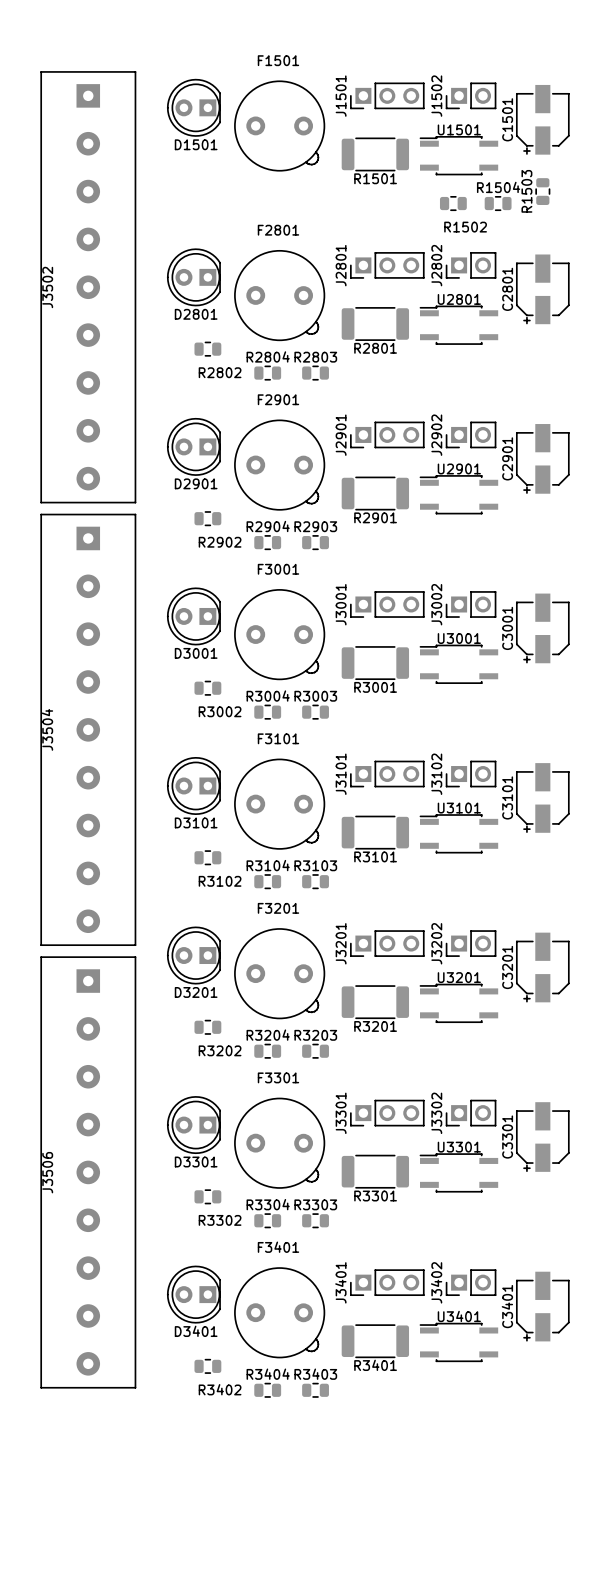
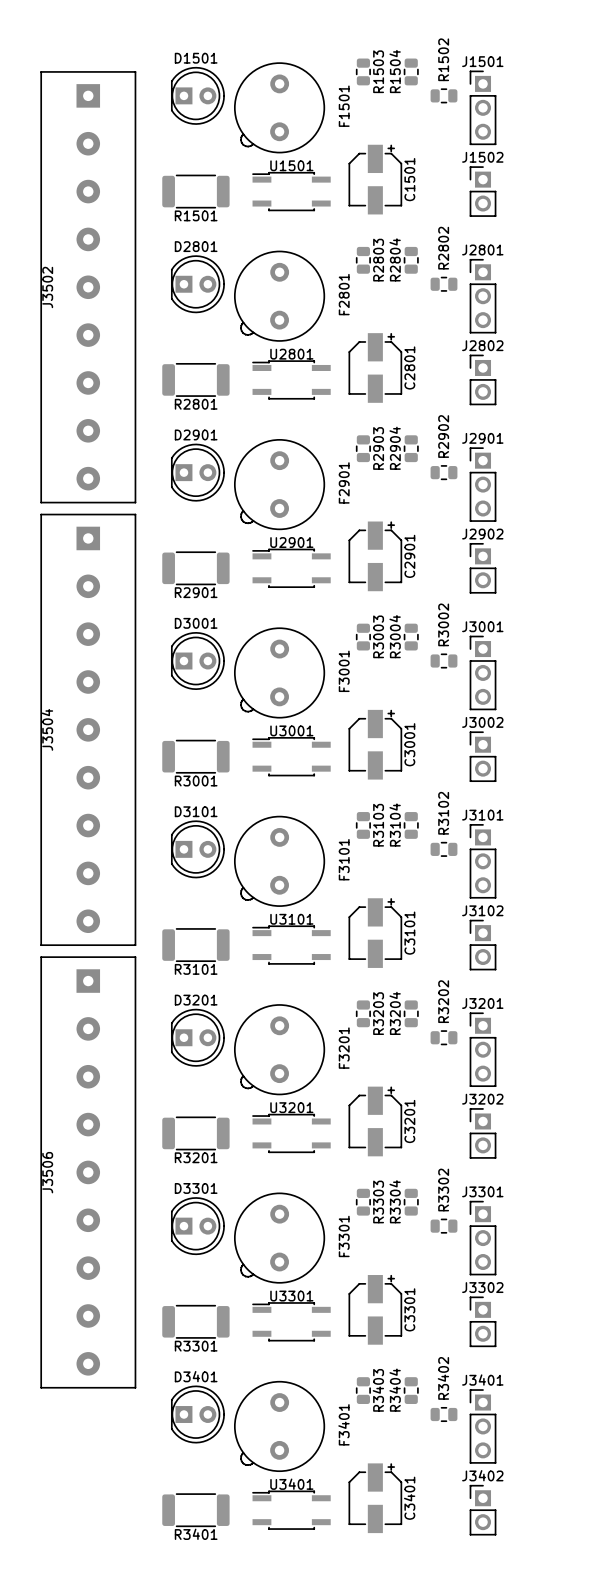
J1501 rotation: 0° (387, 95) -> 90° clockwise (483, 107)
J1501 position: (387, 95) -> (483, 107)
J1502 rotation: 0° (471, 95) -> 90° clockwise (483, 191)
J1502 position: (471, 95) -> (483, 191)
D1501 rotation: 0° (193, 107) -> 180° (197, 95)
C1501 rotation: 0° (542, 119) -> 180° (375, 179)
C1501 position: (542, 119) -> (375, 179)
F1501 rotation: 0° (279, 126) -> 90° clockwise (279, 107)
R1501 position: (375, 154) -> (195, 191)
U1501 position: (459, 155) -> (291, 191)
R1504 name position: R1504 (498, 187) -> R1504 (395, 71)
R1503 name position: R1503 (526, 191) -> R1503 (378, 71)
R1503 position: (542, 191) -> (363, 71)
R1502 position: (453, 203) -> (444, 95)
R1504 rotation: 0° (498, 203) -> 90° clockwise (411, 71)
R1504 position: (498, 203) -> (411, 71)
R1502 name rotation: 0° (465, 227) -> 90° counterclockwise (443, 59)
R1502 name position: R1502 (465, 227) -> R1502 (443, 59)
J2801 rotation: 0° (387, 265) -> 90° clockwise (483, 296)
J2801 position: (387, 265) -> (483, 296)
J2802 rotation: 0° (471, 265) -> 90° clockwise (483, 379)
J2802 position: (471, 265) -> (483, 379)
D2801 rotation: 0° (193, 277) -> 180° (197, 284)
C2801 rotation: 0° (542, 289) -> 180° (375, 367)
C2801 position: (542, 289) -> (375, 367)
F2801 rotation: 0° (279, 295) -> 90° clockwise (279, 296)
R2801 position: (375, 324) -> (195, 379)
U2801 position: (459, 325) -> (291, 379)
R2802 position: (207, 349) -> (444, 284)
R2804 name position: R2804 (268, 356) -> R2804 (395, 259)
R2802 name rotation: 0° (220, 372) -> 90° counterclockwise (443, 248)
R2802 name position: R2802 (220, 372) -> R2802 (443, 248)
R2804 rotation: 0° (267, 373) -> 90° clockwise (411, 260)
R2804 position: (267, 373) -> (411, 260)
R2803 rotation: 0° (315, 373) -> 90° clockwise (363, 260)
R2803 position: (315, 373) -> (363, 260)
D2901 footprint: [167, 418, 221, 476] -> [171, 443, 225, 502]
J2901 rotation: 0° (387, 434) -> 90° clockwise (483, 484)
J2901 position: (387, 434) -> (483, 484)
J2902 rotation: 0° (471, 434) -> 90° clockwise (483, 568)
J2902 position: (471, 434) -> (483, 568)
C2901 rotation: 0° (542, 458) -> 180° (375, 556)
C2901 position: (542, 458) -> (375, 556)
F2901 rotation: 0° (279, 465) -> 90° clockwise (279, 484)
D2901 name position: D2901 (196, 483) -> D2901 (196, 434)
R2901 position: (375, 493) -> (195, 568)
U2901 position: (459, 494) -> (291, 568)
R2902 position: (207, 518) -> (444, 472)
R2904 name position: R2904 (268, 526) -> R2904 (395, 448)
R2902 name rotation: 0° (220, 542) -> 90° counterclockwise (443, 436)
R2902 name position: R2902 (220, 542) -> R2902 (443, 436)
R2904 rotation: 0° (267, 542) -> 90° clockwise (411, 448)
R2904 position: (267, 542) -> (411, 448)
R2903 rotation: 0° (315, 542) -> 90° clockwise (363, 448)
R2903 position: (315, 542) -> (363, 448)
J3001 rotation: 0° (387, 604) -> 90° clockwise (483, 672)
J3001 position: (387, 604) -> (483, 672)
J3002 rotation: 0° (471, 604) -> 90° clockwise (483, 756)
J3002 position: (471, 604) -> (483, 756)
D3001 rotation: 0° (193, 616) -> 180° (197, 661)
D3001 position: (193, 616) -> (197, 661)
C3001 rotation: 0° (542, 628) -> 180° (375, 744)
C3001 position: (542, 628) -> (375, 744)
F3001 rotation: 0° (279, 634) -> 90° clockwise (279, 672)
R3001 position: (375, 663) -> (195, 756)
U3001 position: (459, 664) -> (291, 756)
R3002 position: (207, 688) -> (444, 661)
R3004 name position: R3004 (268, 696) -> R3004 (395, 636)
R3002 name rotation: 0° (220, 711) -> 90° counterclockwise (443, 624)
R3002 name position: R3002 (220, 711) -> R3002 (443, 624)
R3004 rotation: 0° (267, 712) -> 90° clockwise (411, 637)
R3004 position: (267, 712) -> (411, 637)
R3003 rotation: 0° (315, 712) -> 90° clockwise (363, 637)
R3003 position: (315, 712) -> (363, 637)
J3101 rotation: 0° (387, 774) -> 90° clockwise (483, 861)
J3101 position: (387, 774) -> (483, 861)
J3102 rotation: 0° (471, 774) -> 90° clockwise (483, 945)
J3102 position: (471, 774) -> (483, 945)
D3101 rotation: 0° (193, 785) -> 180° (197, 849)
D3101 position: (193, 785) -> (197, 849)
C3101 rotation: 0° (542, 797) -> 180° (375, 933)
C3101 position: (542, 797) -> (375, 933)
F3101 rotation: 0° (279, 804) -> 90° clockwise (279, 861)
F3101 position: (279, 804) -> (279, 861)
R3101 position: (375, 832) -> (195, 945)
U3101 position: (459, 833) -> (291, 945)
R3102 position: (207, 857) -> (444, 849)
R3104 name position: R3104 (268, 865) -> R3104 (395, 825)
R3102 name rotation: 0° (220, 881) -> 90° counterclockwise (443, 813)
R3102 name position: R3102 (220, 881) -> R3102 (443, 813)
R3104 rotation: 0° (267, 881) -> 90° clockwise (411, 825)
R3104 position: (267, 881) -> (411, 825)
R3103 rotation: 0° (315, 881) -> 90° clockwise (363, 825)
R3103 position: (315, 881) -> (363, 825)
J3201 rotation: 0° (387, 943) -> 90° clockwise (483, 1049)
J3201 position: (387, 943) -> (483, 1049)
J3202 rotation: 0° (471, 943) -> 90° clockwise (483, 1133)
J3202 position: (471, 943) -> (483, 1133)
D3201 rotation: 0° (193, 955) -> 180° (197, 1037)
D3201 position: (193, 955) -> (197, 1037)
C3201 rotation: 0° (542, 967) -> 180° (375, 1121)
C3201 position: (542, 967) -> (375, 1121)
F3201 rotation: 0° (279, 973) -> 90° clockwise (279, 1049)
F3201 position: (279, 973) -> (279, 1049)
R3201 position: (375, 1002) -> (195, 1133)
U3201 position: (459, 1003) -> (291, 1133)
R3202 position: (207, 1027) -> (444, 1037)
R3204 name position: R3204 (268, 1035) -> R3204 (395, 1013)
R3202 name rotation: 0° (220, 1050) -> 90° counterclockwise (443, 1001)
R3202 name position: R3202 (220, 1050) -> R3202 (443, 1001)
R3204 rotation: 0° (267, 1051) -> 90° clockwise (411, 1013)
R3204 position: (267, 1051) -> (411, 1013)
R3203 rotation: 0° (315, 1051) -> 90° clockwise (363, 1013)
R3203 position: (315, 1051) -> (363, 1013)
J3301 rotation: 0° (387, 1113) -> 90° clockwise (483, 1238)
J3301 position: (387, 1113) -> (483, 1238)
J3302 rotation: 0° (471, 1113) -> 90° clockwise (483, 1321)
J3302 position: (471, 1113) -> (483, 1321)
D3301 rotation: 0° (193, 1125) -> 180° (197, 1226)
D3301 position: (193, 1125) -> (197, 1226)
C3301 rotation: 0° (542, 1137) -> 180° (375, 1309)
C3301 position: (542, 1137) -> (375, 1309)
F3301 rotation: 0° (279, 1143) -> 90° clockwise (279, 1238)
F3301 position: (279, 1143) -> (279, 1238)
R3301 position: (375, 1171) -> (195, 1321)
U3301 position: (459, 1172) -> (291, 1321)
R3302 position: (207, 1196) -> (444, 1226)
R3304 name position: R3304 (268, 1204) -> R3304 (395, 1201)
R3302 name rotation: 0° (220, 1220) -> 90° counterclockwise (443, 1190)
R3302 name position: R3302 (220, 1220) -> R3302 (443, 1190)
R3304 rotation: 0° (267, 1220) -> 90° clockwise (411, 1202)
R3304 position: (267, 1220) -> (411, 1202)
R3303 rotation: 0° (315, 1220) -> 90° clockwise (363, 1202)
R3303 position: (315, 1220) -> (363, 1202)
J3401 rotation: 0° (387, 1282) -> 90° clockwise (483, 1426)
J3401 position: (387, 1282) -> (483, 1426)
J3402 rotation: 0° (471, 1282) -> 90° clockwise (483, 1510)
J3402 position: (471, 1282) -> (483, 1510)
D3401 rotation: 0° (193, 1294) -> 180° (197, 1414)
D3401 position: (193, 1294) -> (197, 1414)
C3401 rotation: 0° (542, 1306) -> 180° (375, 1498)
C3401 position: (542, 1306) -> (375, 1498)
F3401 rotation: 0° (279, 1312) -> 90° clockwise (279, 1426)
F3401 position: (279, 1312) -> (279, 1426)
R3401 position: (375, 1341) -> (195, 1510)
U3401 position: (459, 1342) -> (291, 1510)
R3402 position: (207, 1366) -> (444, 1414)
R3404 name position: R3404 (268, 1374) -> R3404 (395, 1390)
R3402 name rotation: 0° (220, 1389) -> 90° counterclockwise (443, 1378)
R3402 name position: R3402 (220, 1389) -> R3402 (443, 1378)
R3404 rotation: 0° (267, 1390) -> 90° clockwise (411, 1390)
R3404 position: (267, 1390) -> (411, 1390)
R3403 rotation: 0° (315, 1390) -> 90° clockwise (363, 1390)
R3403 position: (315, 1390) -> (363, 1390)

